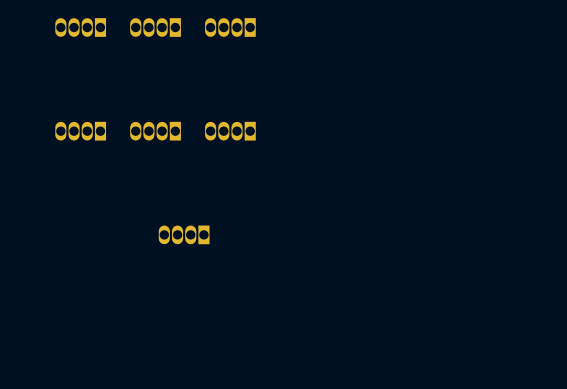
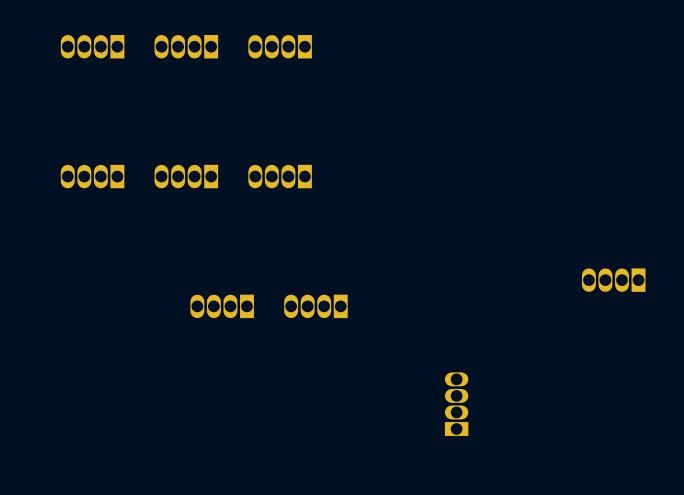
part: none -> (613, 280)
part: none -> (315, 306)
part: none -> (456, 404)

